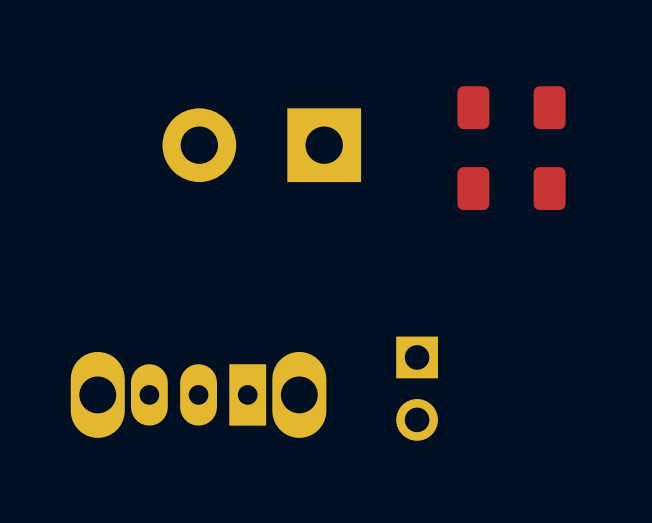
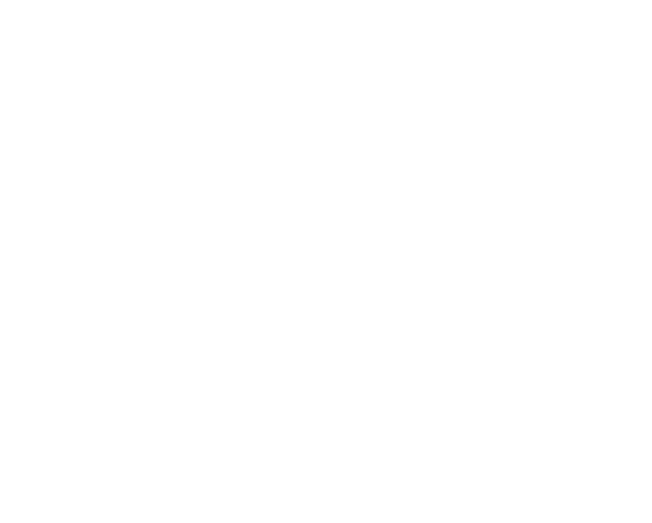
part: (511, 107) -> none
part: (261, 145) -> none
part: (511, 188) -> none
part: (417, 388) -> none
part: (198, 394) -> none

